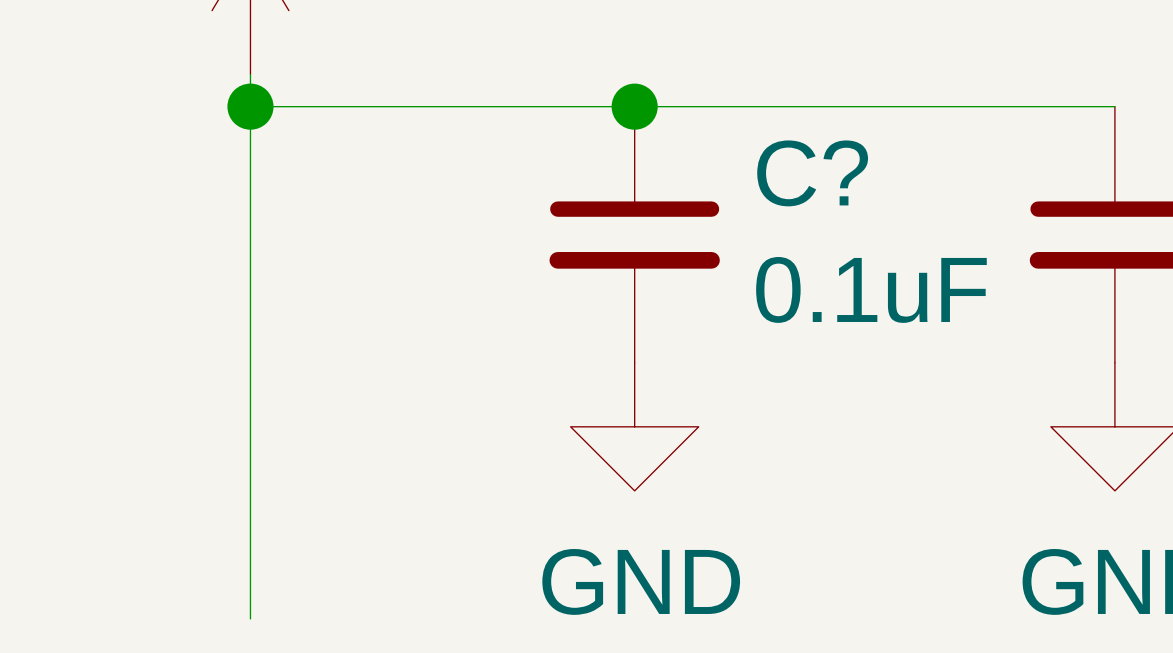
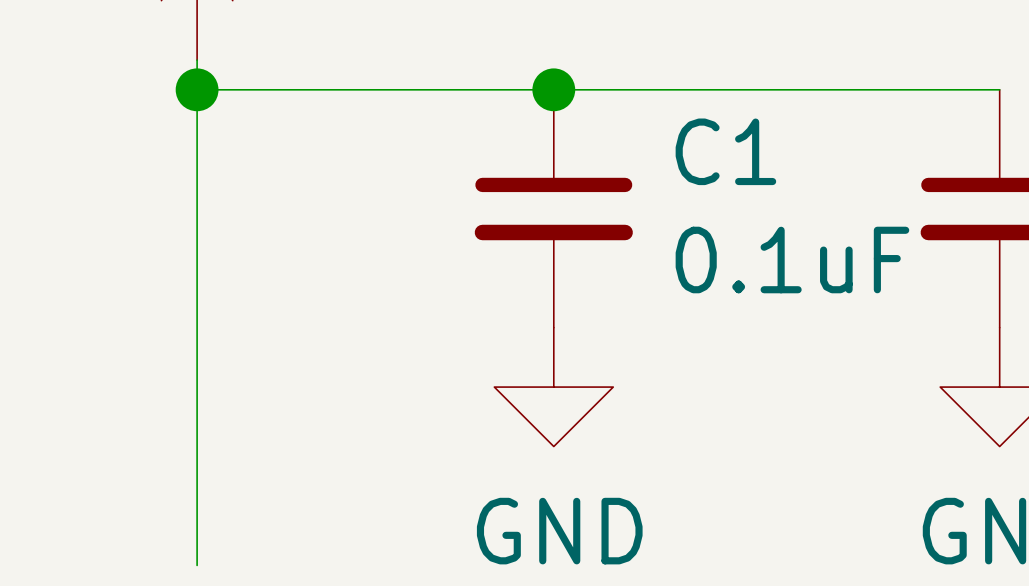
C? name: C? (812, 173) -> C1 (725, 151)

